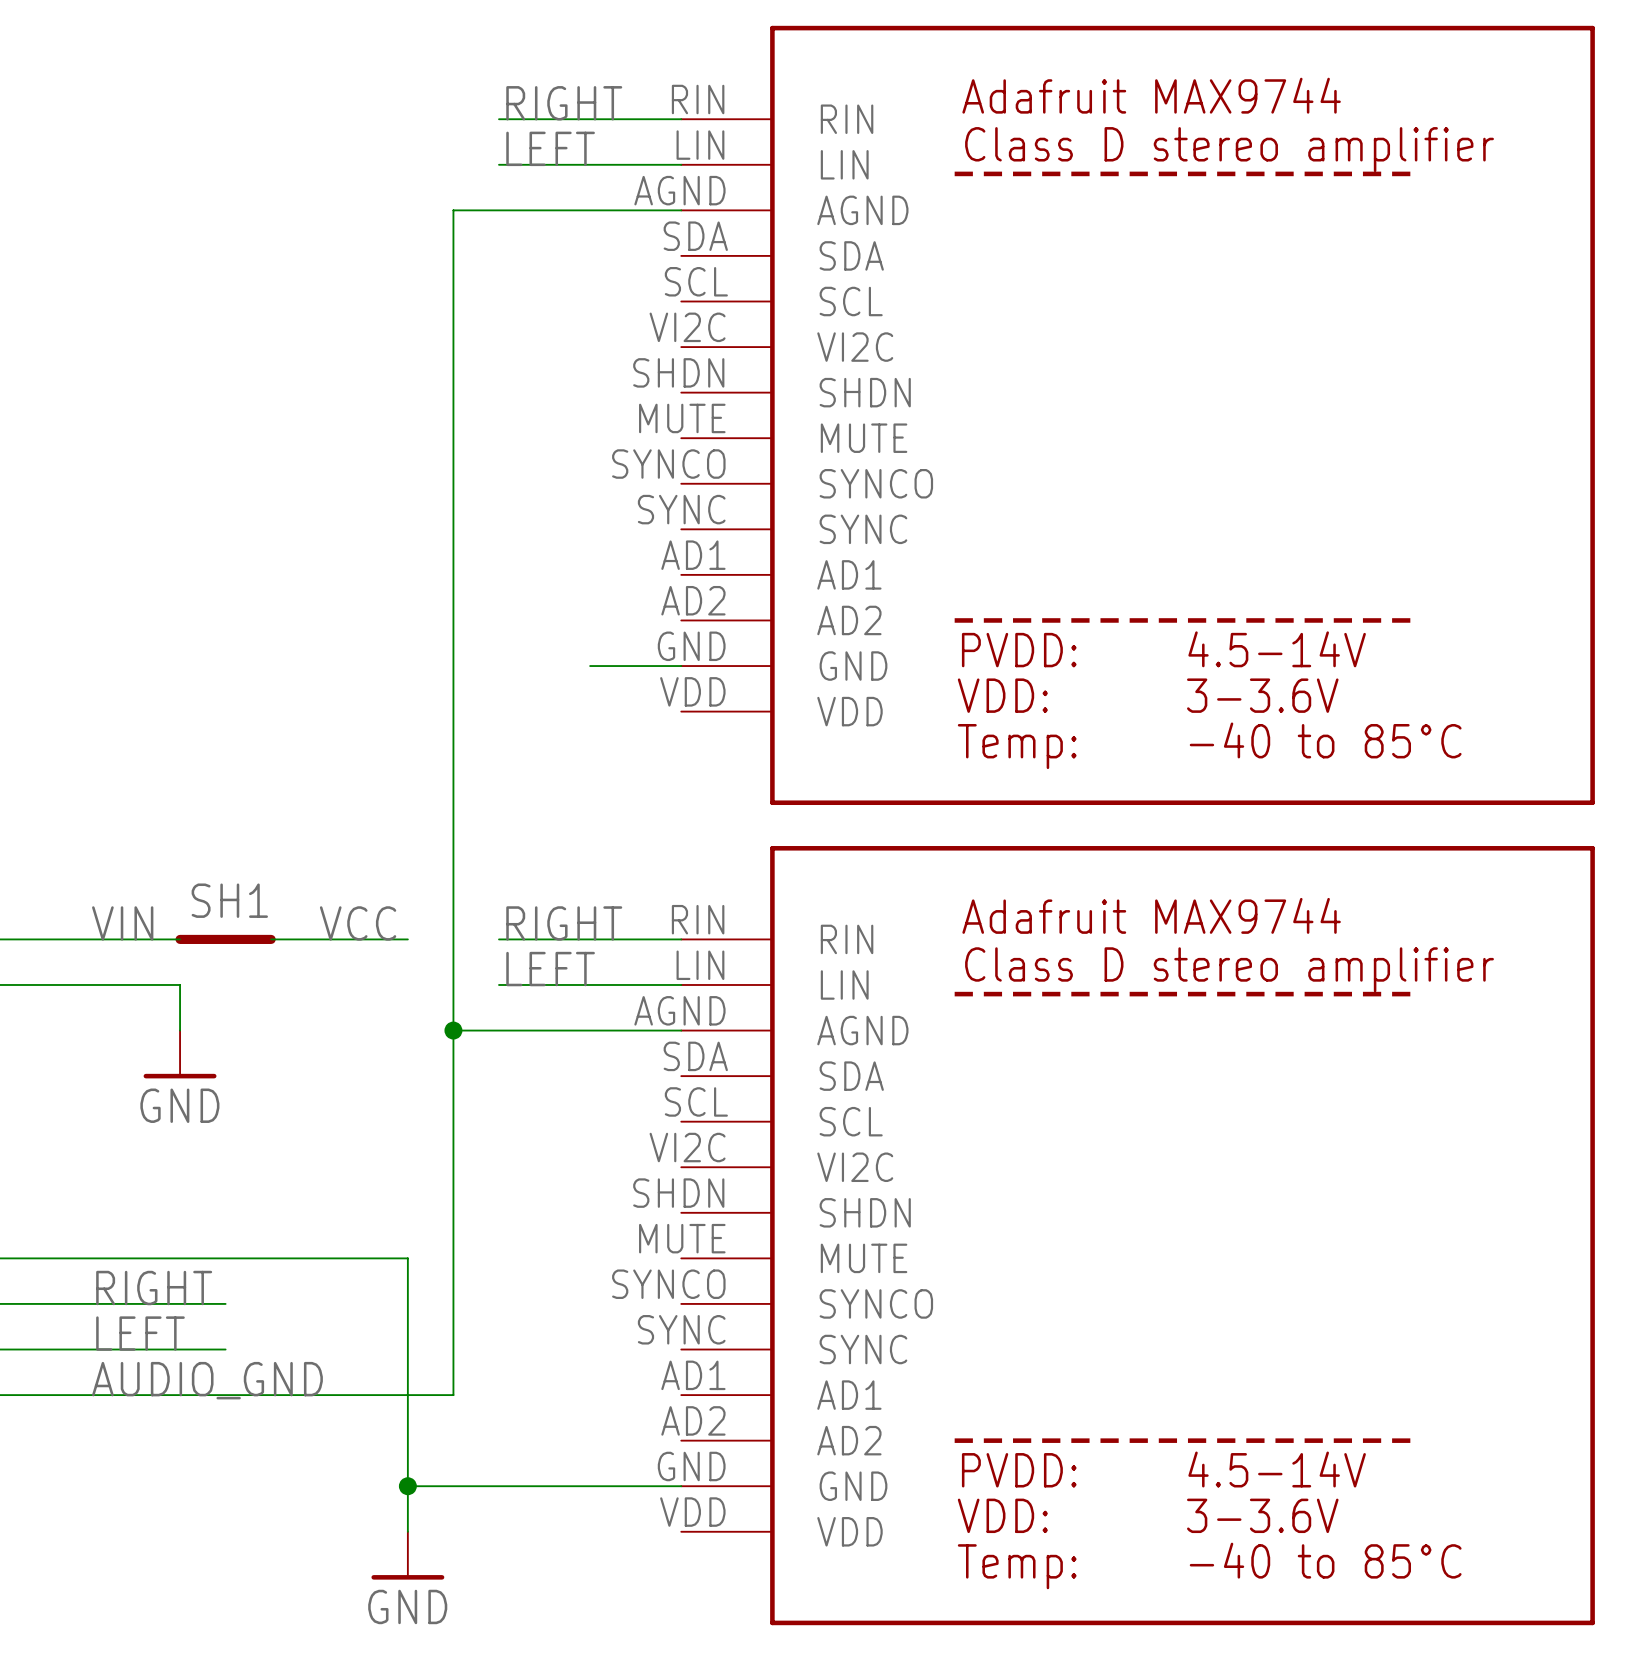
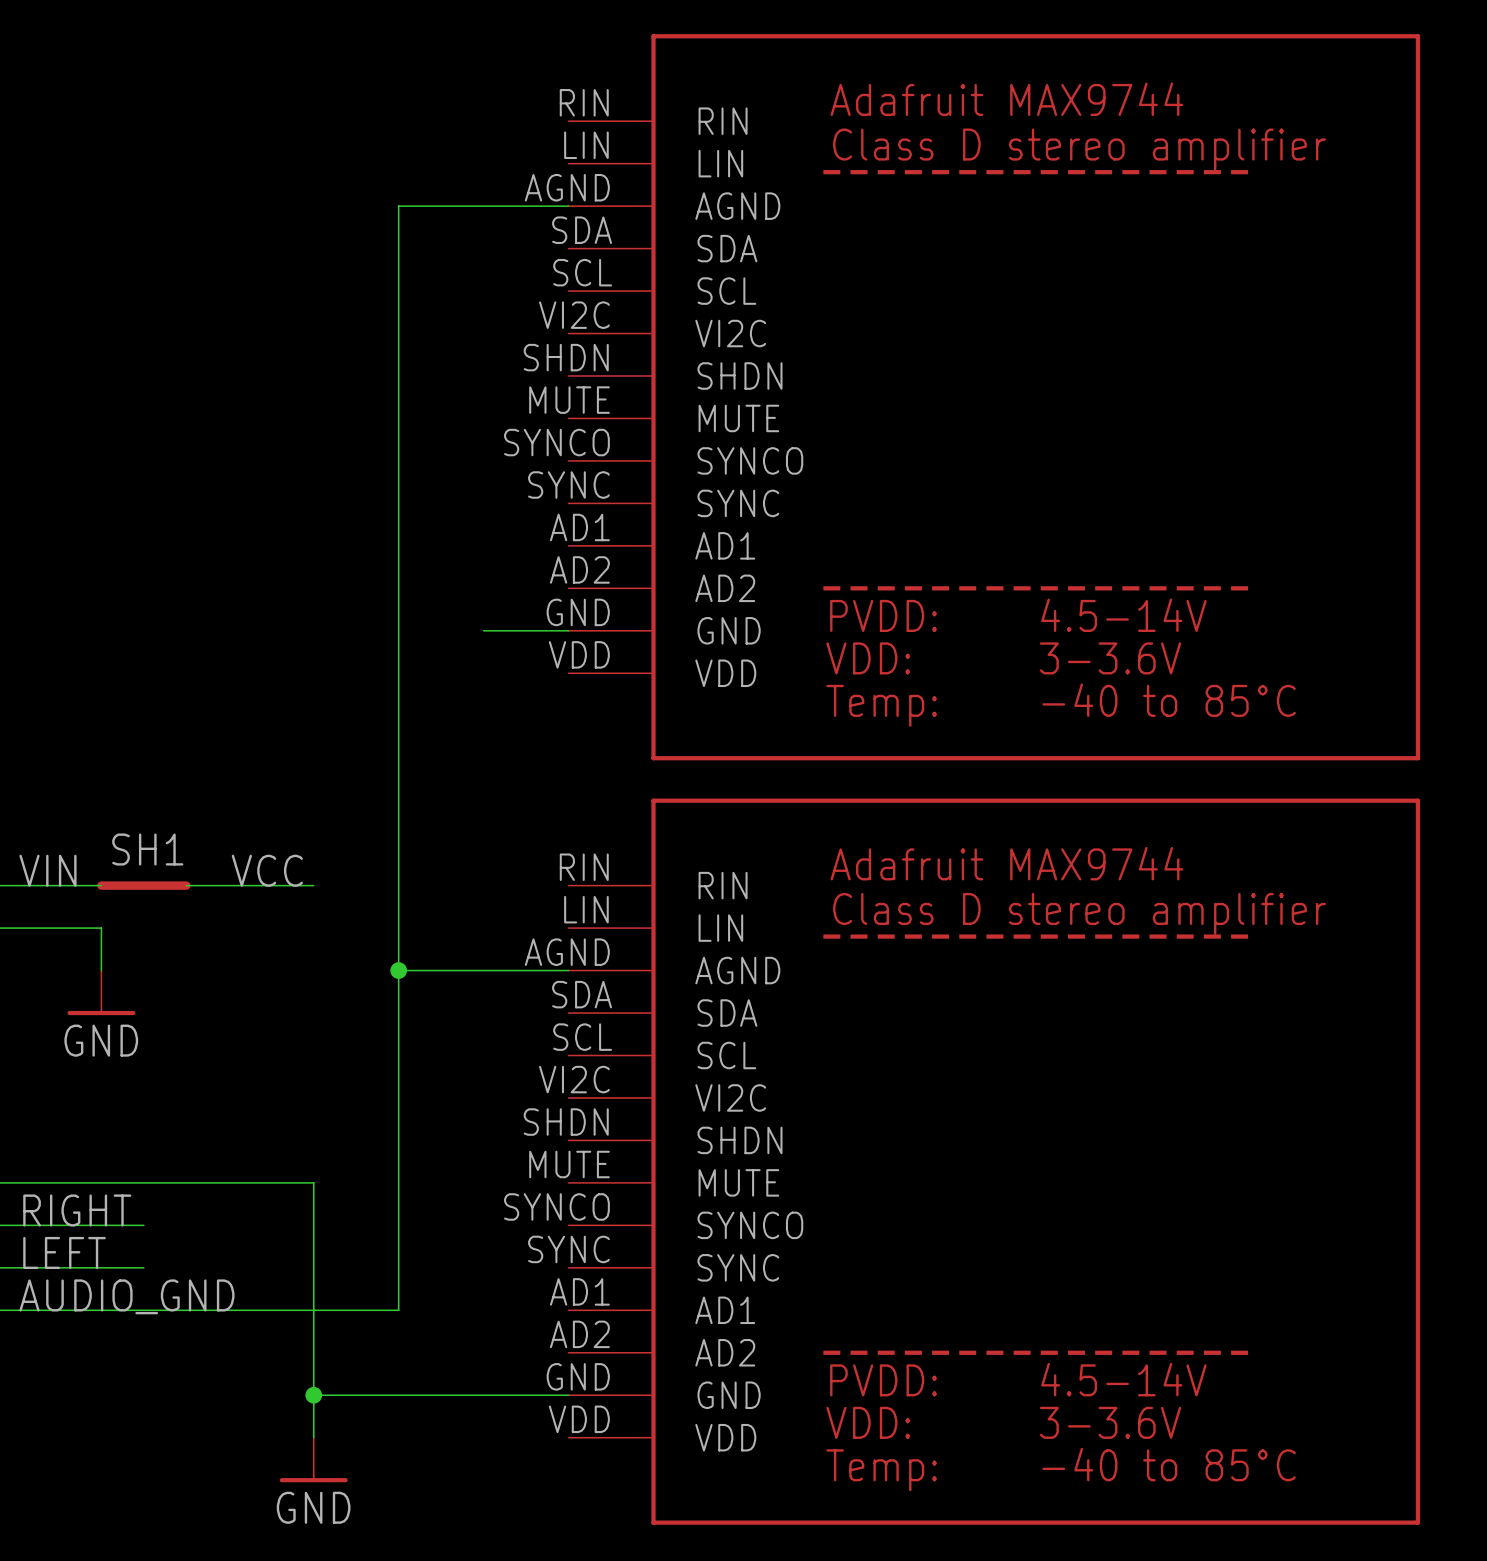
label: RIGHT (564, 103) -> none
wire: (499, 119) (681, 119) -> none
label: LEFT (550, 148) -> none
wire: (499, 164) (681, 164) -> none
wire: (499, 210) (453, 210) (453, 1395) -> (398, 206) (398, 1310) (356, 1310)
label: RIGHT (564, 923) -> none
wire: (499, 939) (681, 939) -> none
label: LEFT (550, 969) -> none
wire: (499, 984) (681, 984) -> none
wire: (453, 1030) (499, 1030) -> none
junction position: (453, 1030) -> (398, 970)

